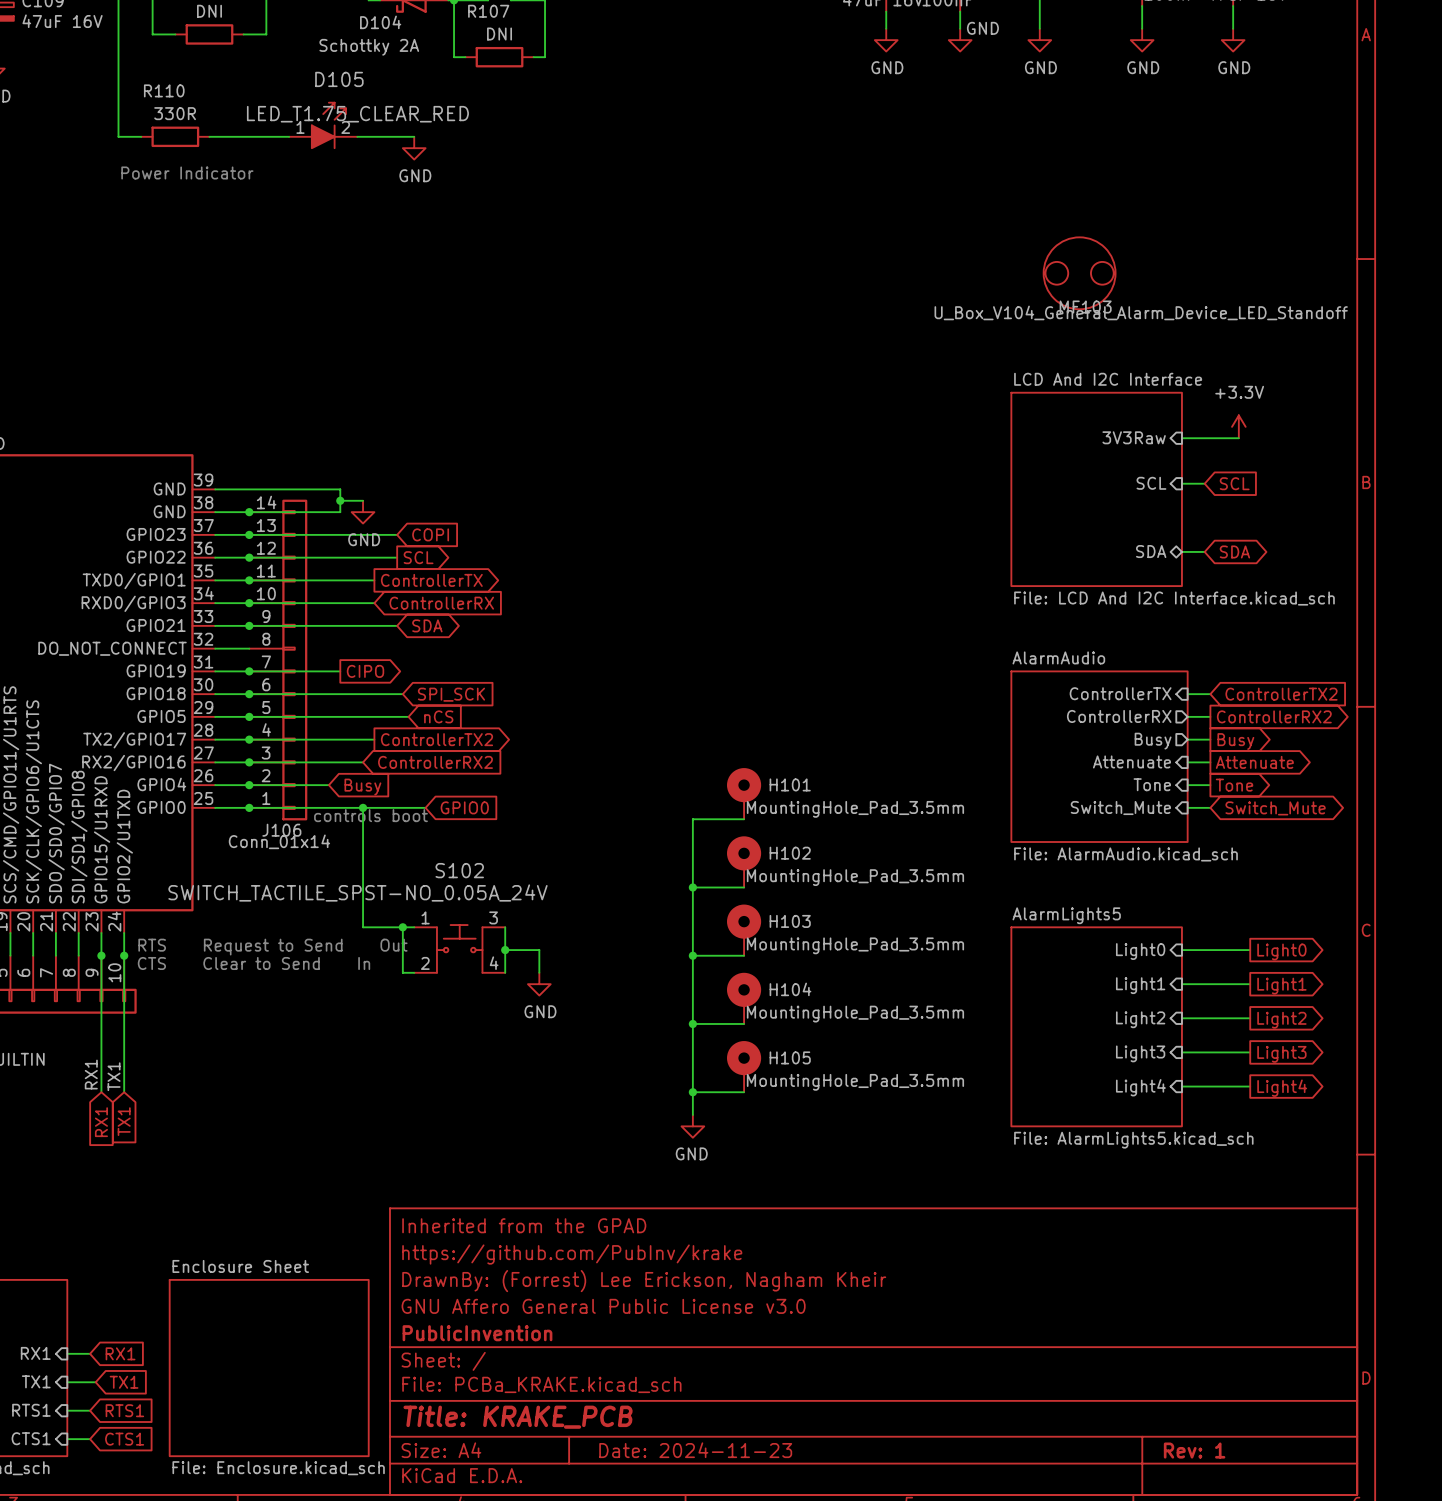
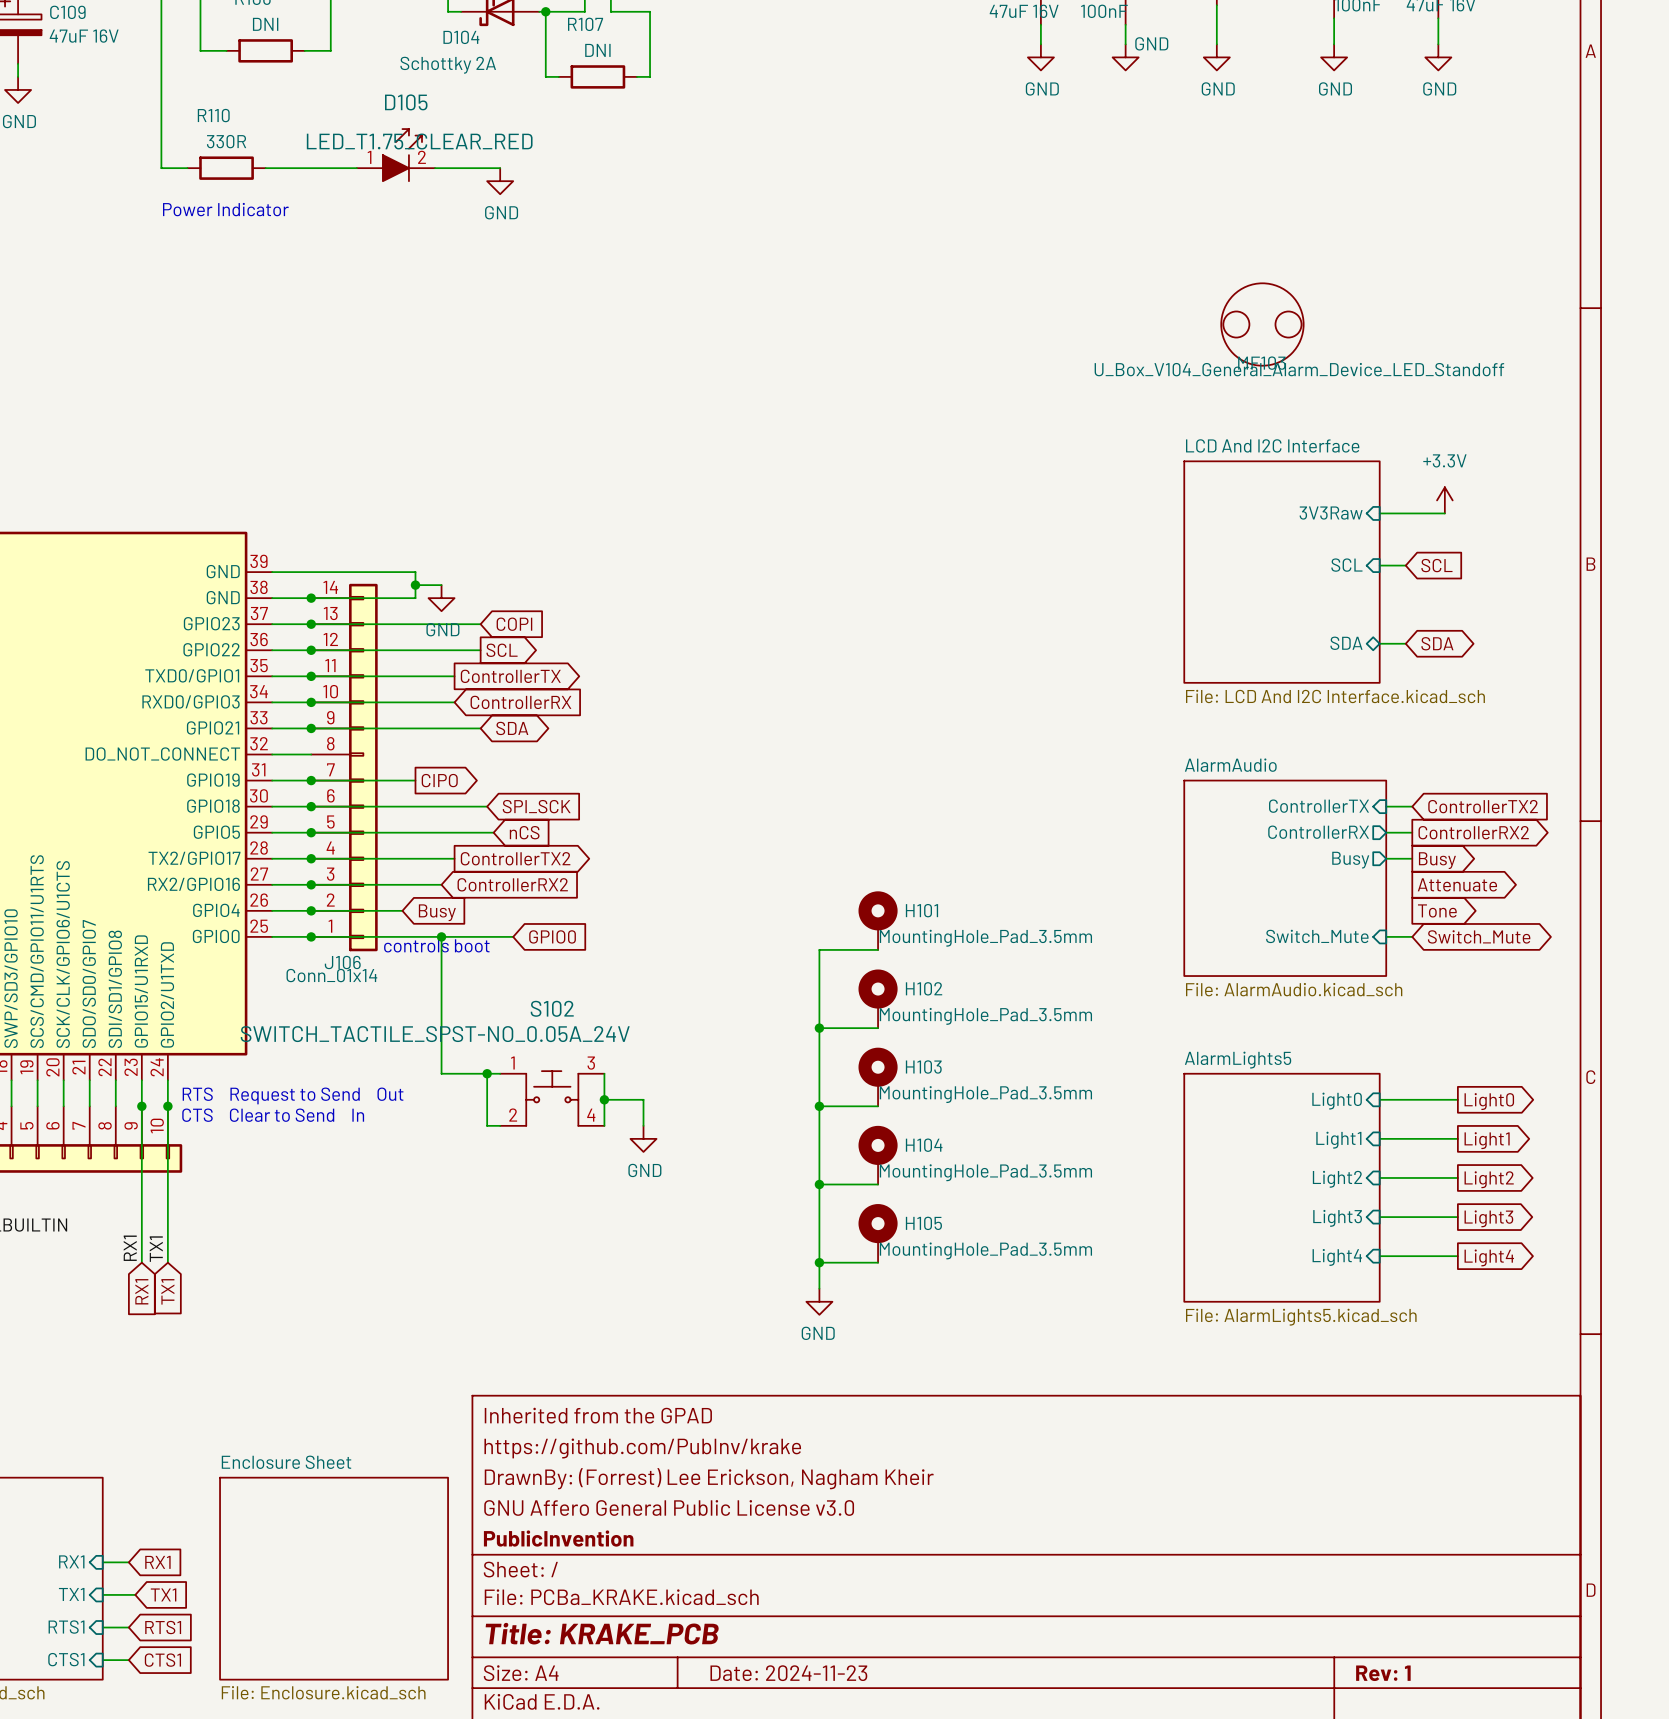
sheet pin: Attenuate (1131, 761) -> none
wire: (1187, 762) (1210, 762) -> none
sheet pin: Tone (1152, 784) -> none
wire: (1187, 785) (1210, 785) -> none

